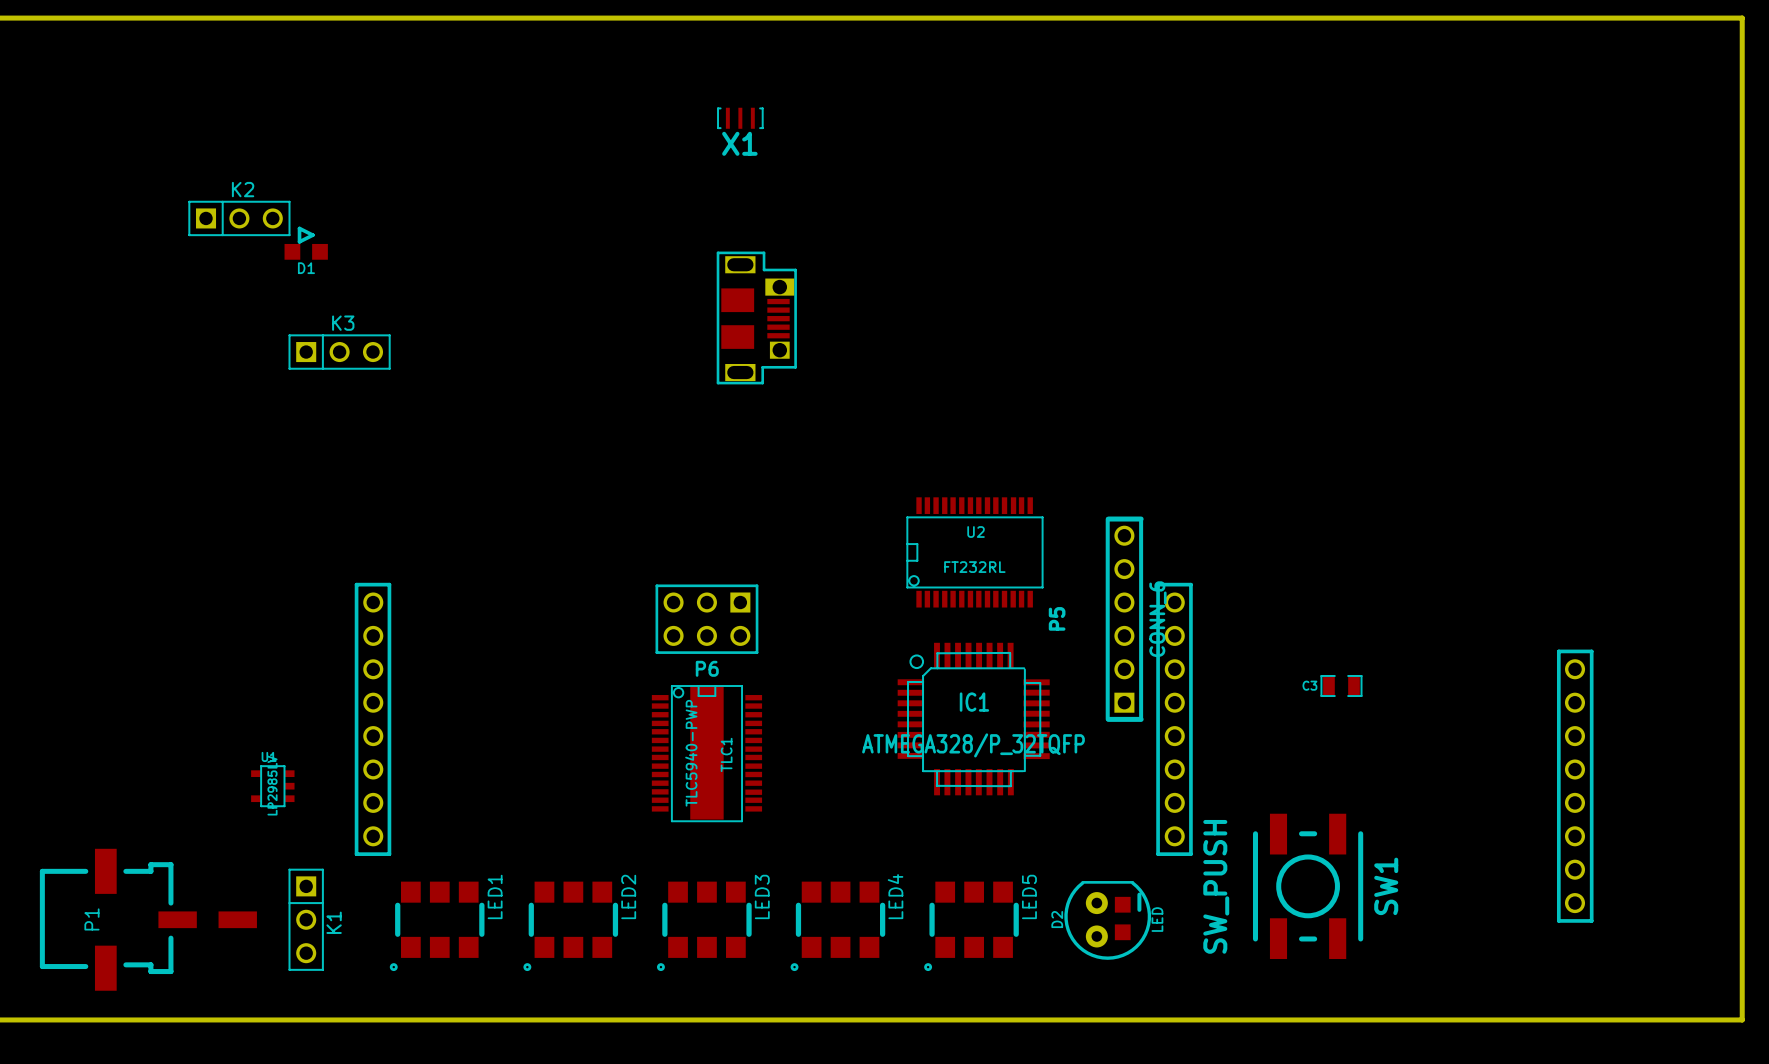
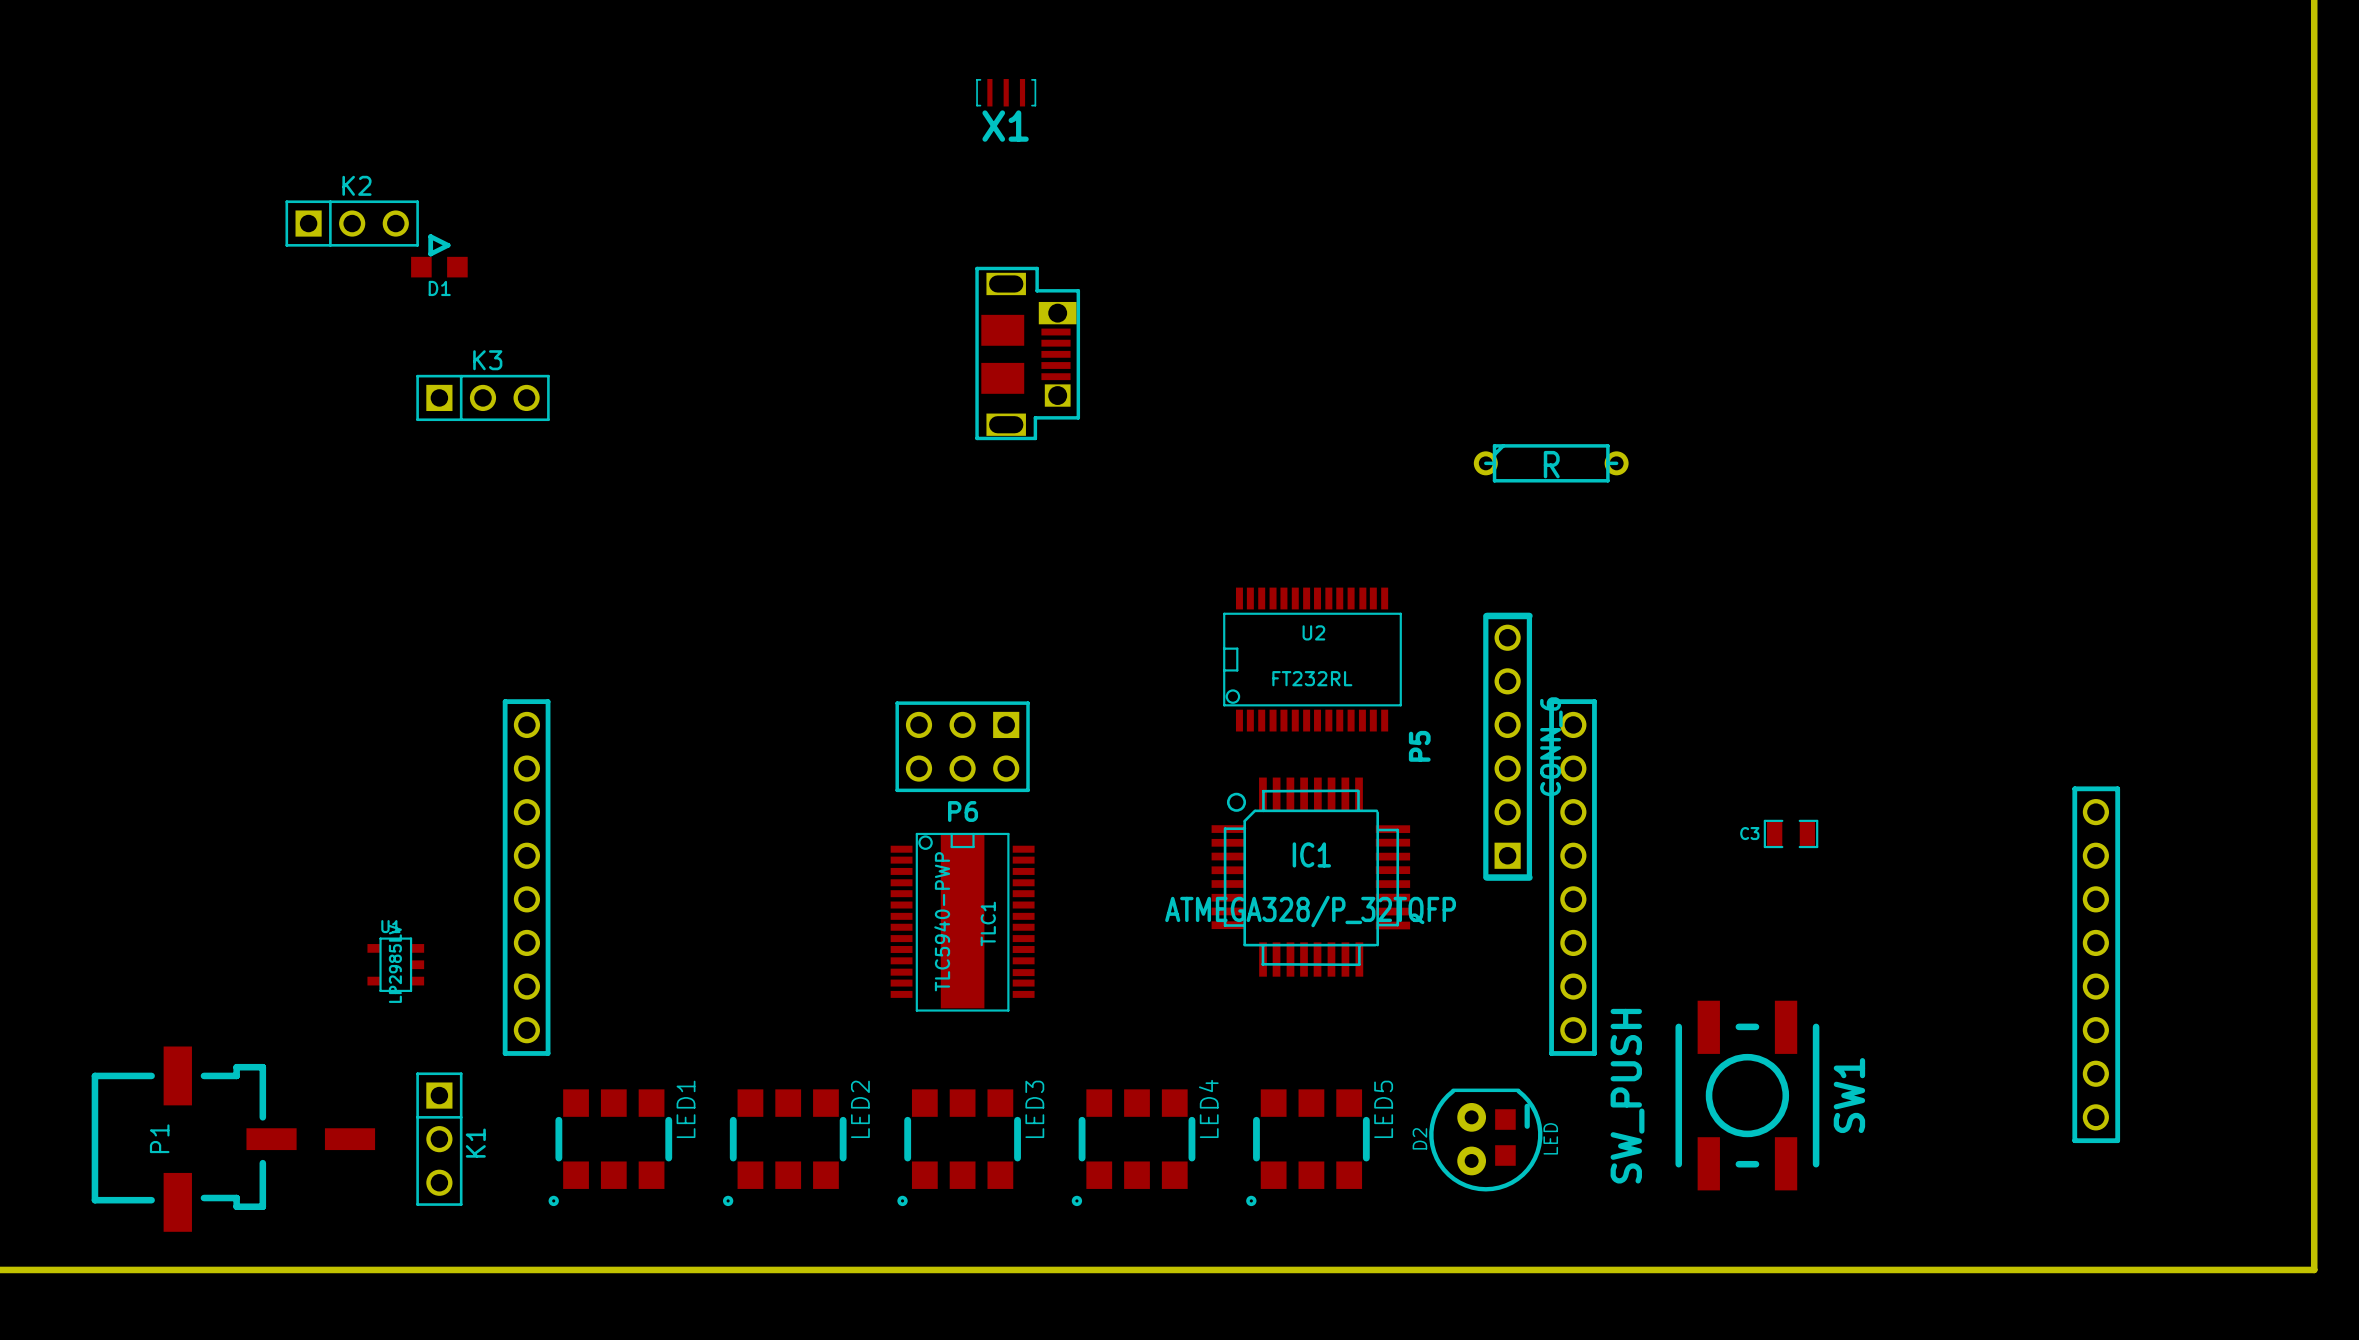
part: none -> R (1551, 463)

